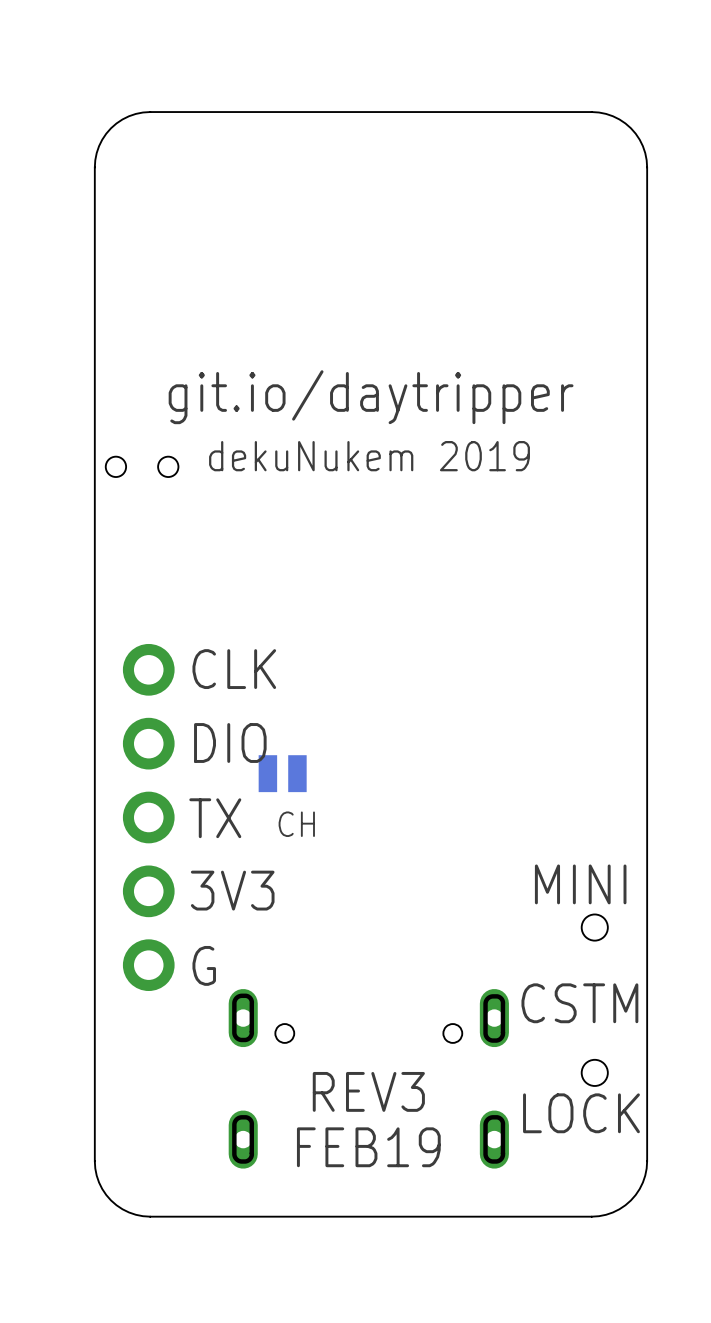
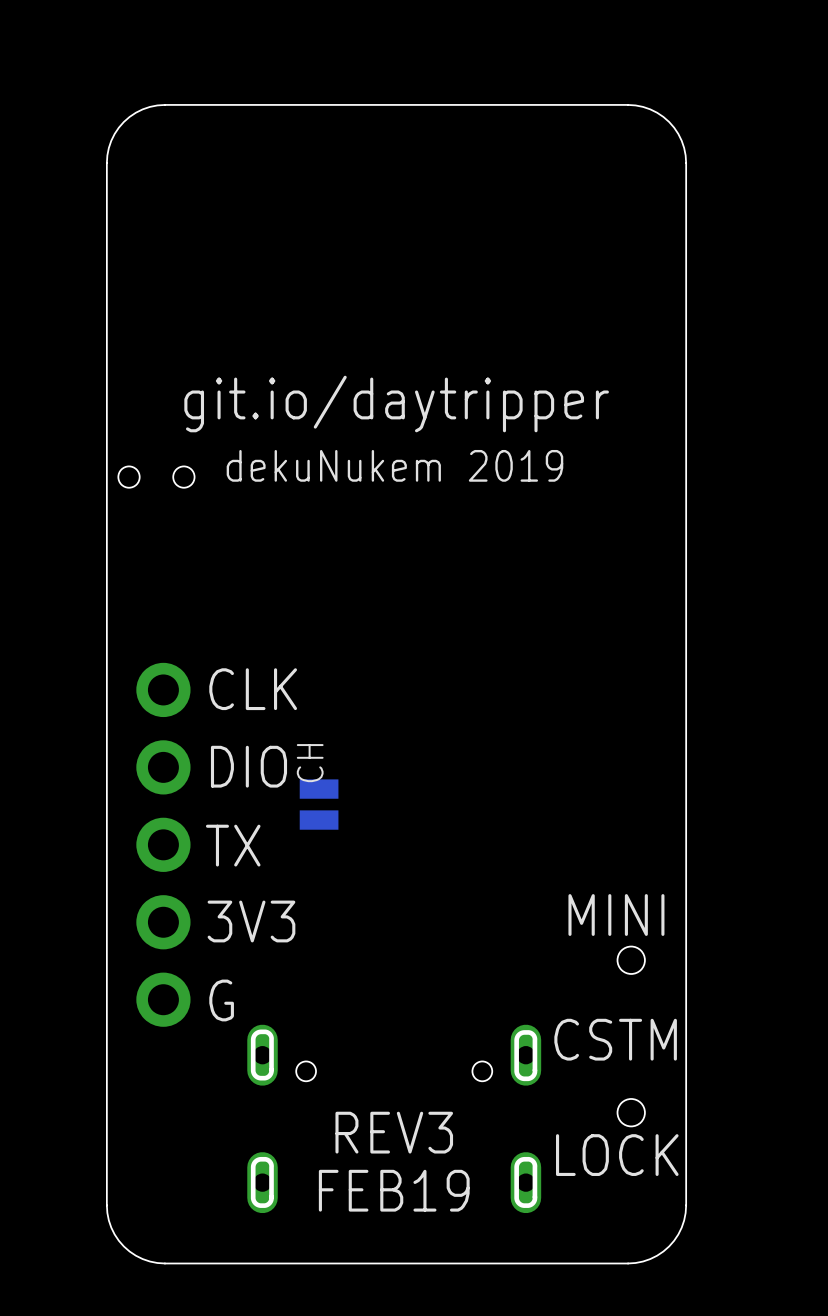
part rotation: 0° (282, 773) -> 90° clockwise (319, 804)
text rotation: 0° (296, 824) -> 90° counterclockwise (310, 763)
text position: CH (296, 824) -> CH (310, 763)

